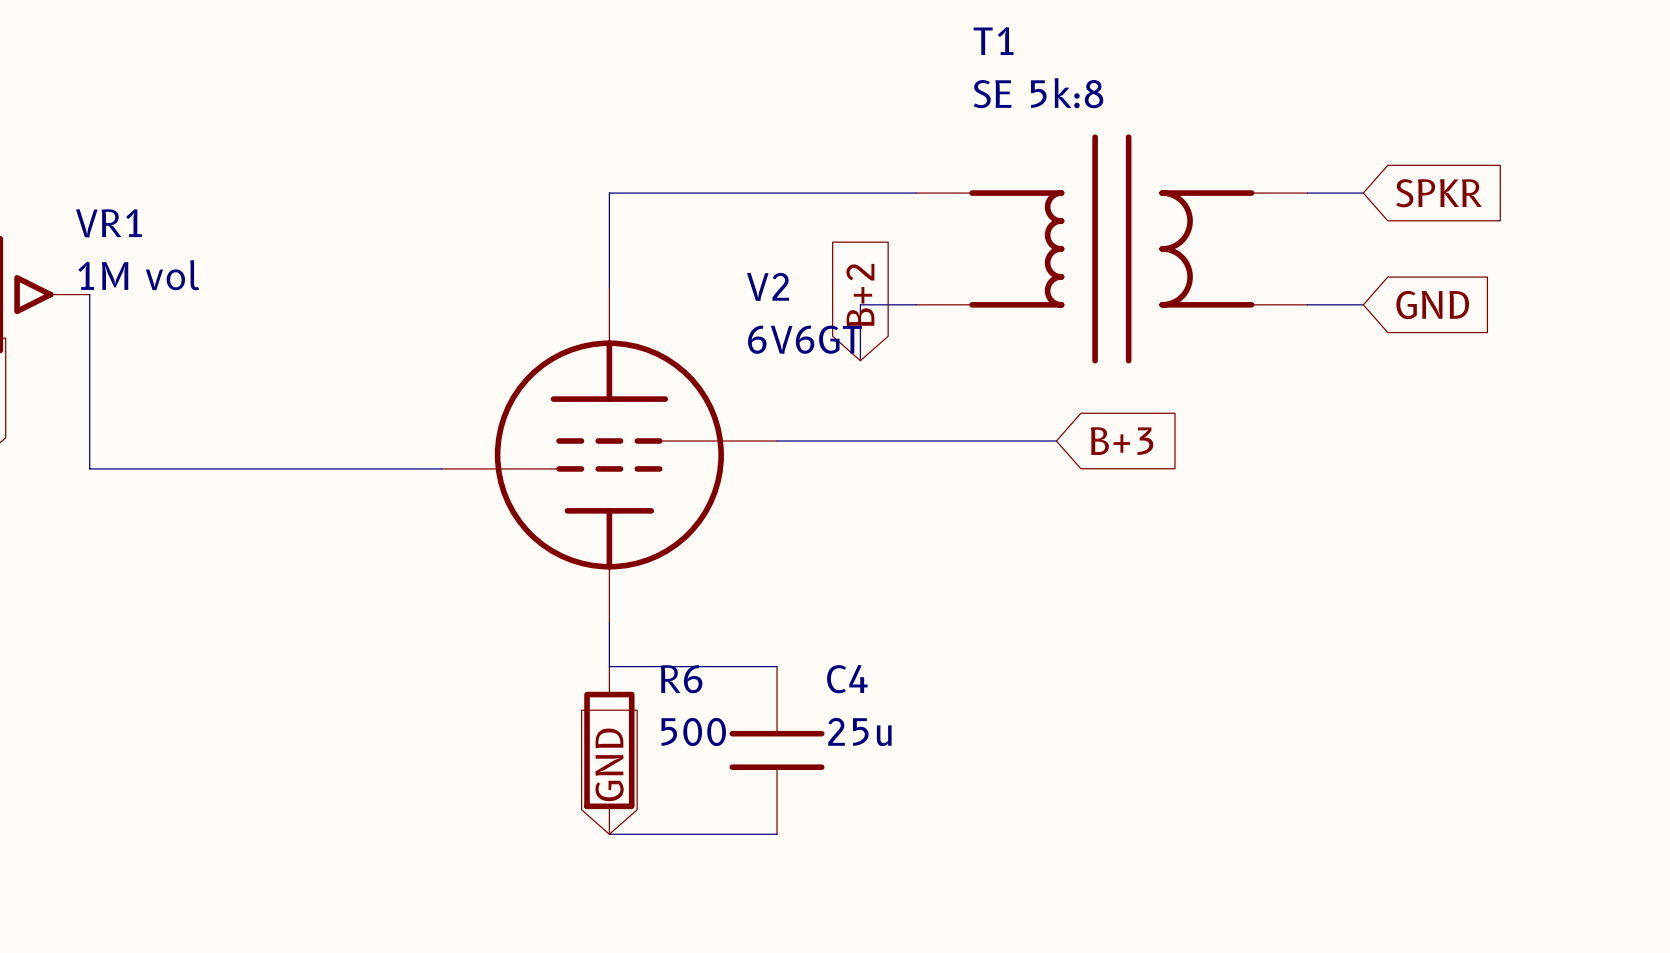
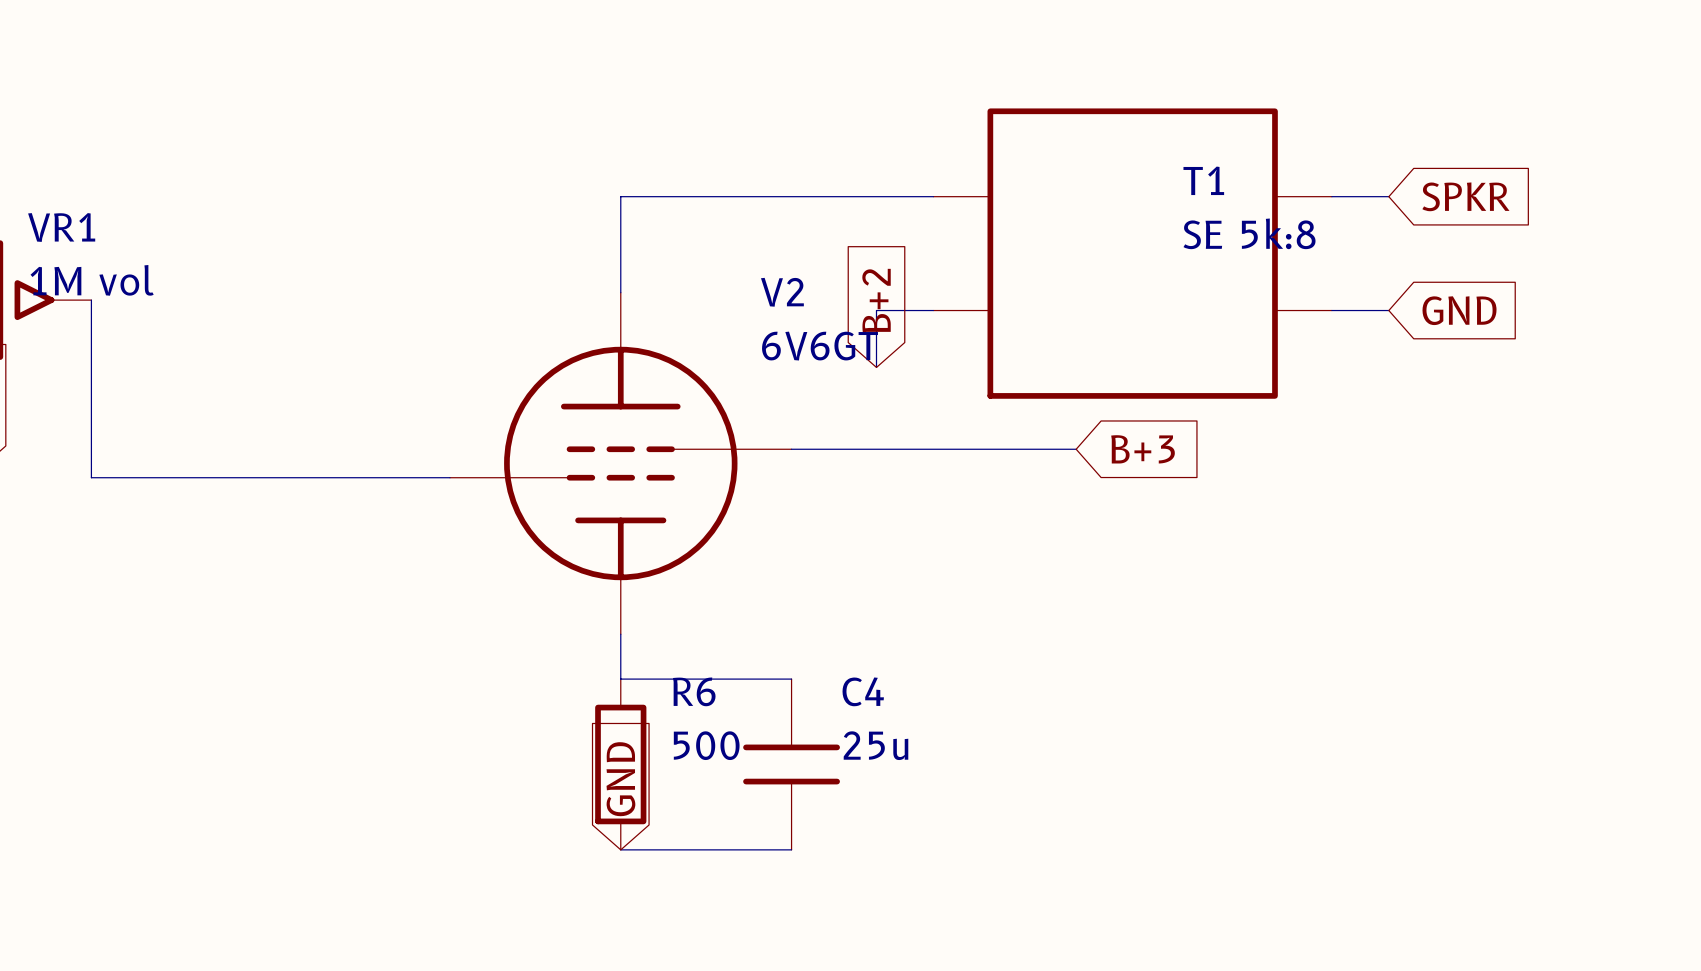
T1 name position: T1 (993, 41) -> T1 (1203, 180)
T1 value position: SE 5k:8 (1038, 93) -> SE 5k:8 (1249, 233)
T1 symbol: [916, 134, 1308, 364] -> [933, 108, 1332, 399]
VR1 name position: VR1 (108, 223) -> VR1 (61, 227)
VR1 value position: 1M vol (138, 275) -> 1M vol (92, 280)

